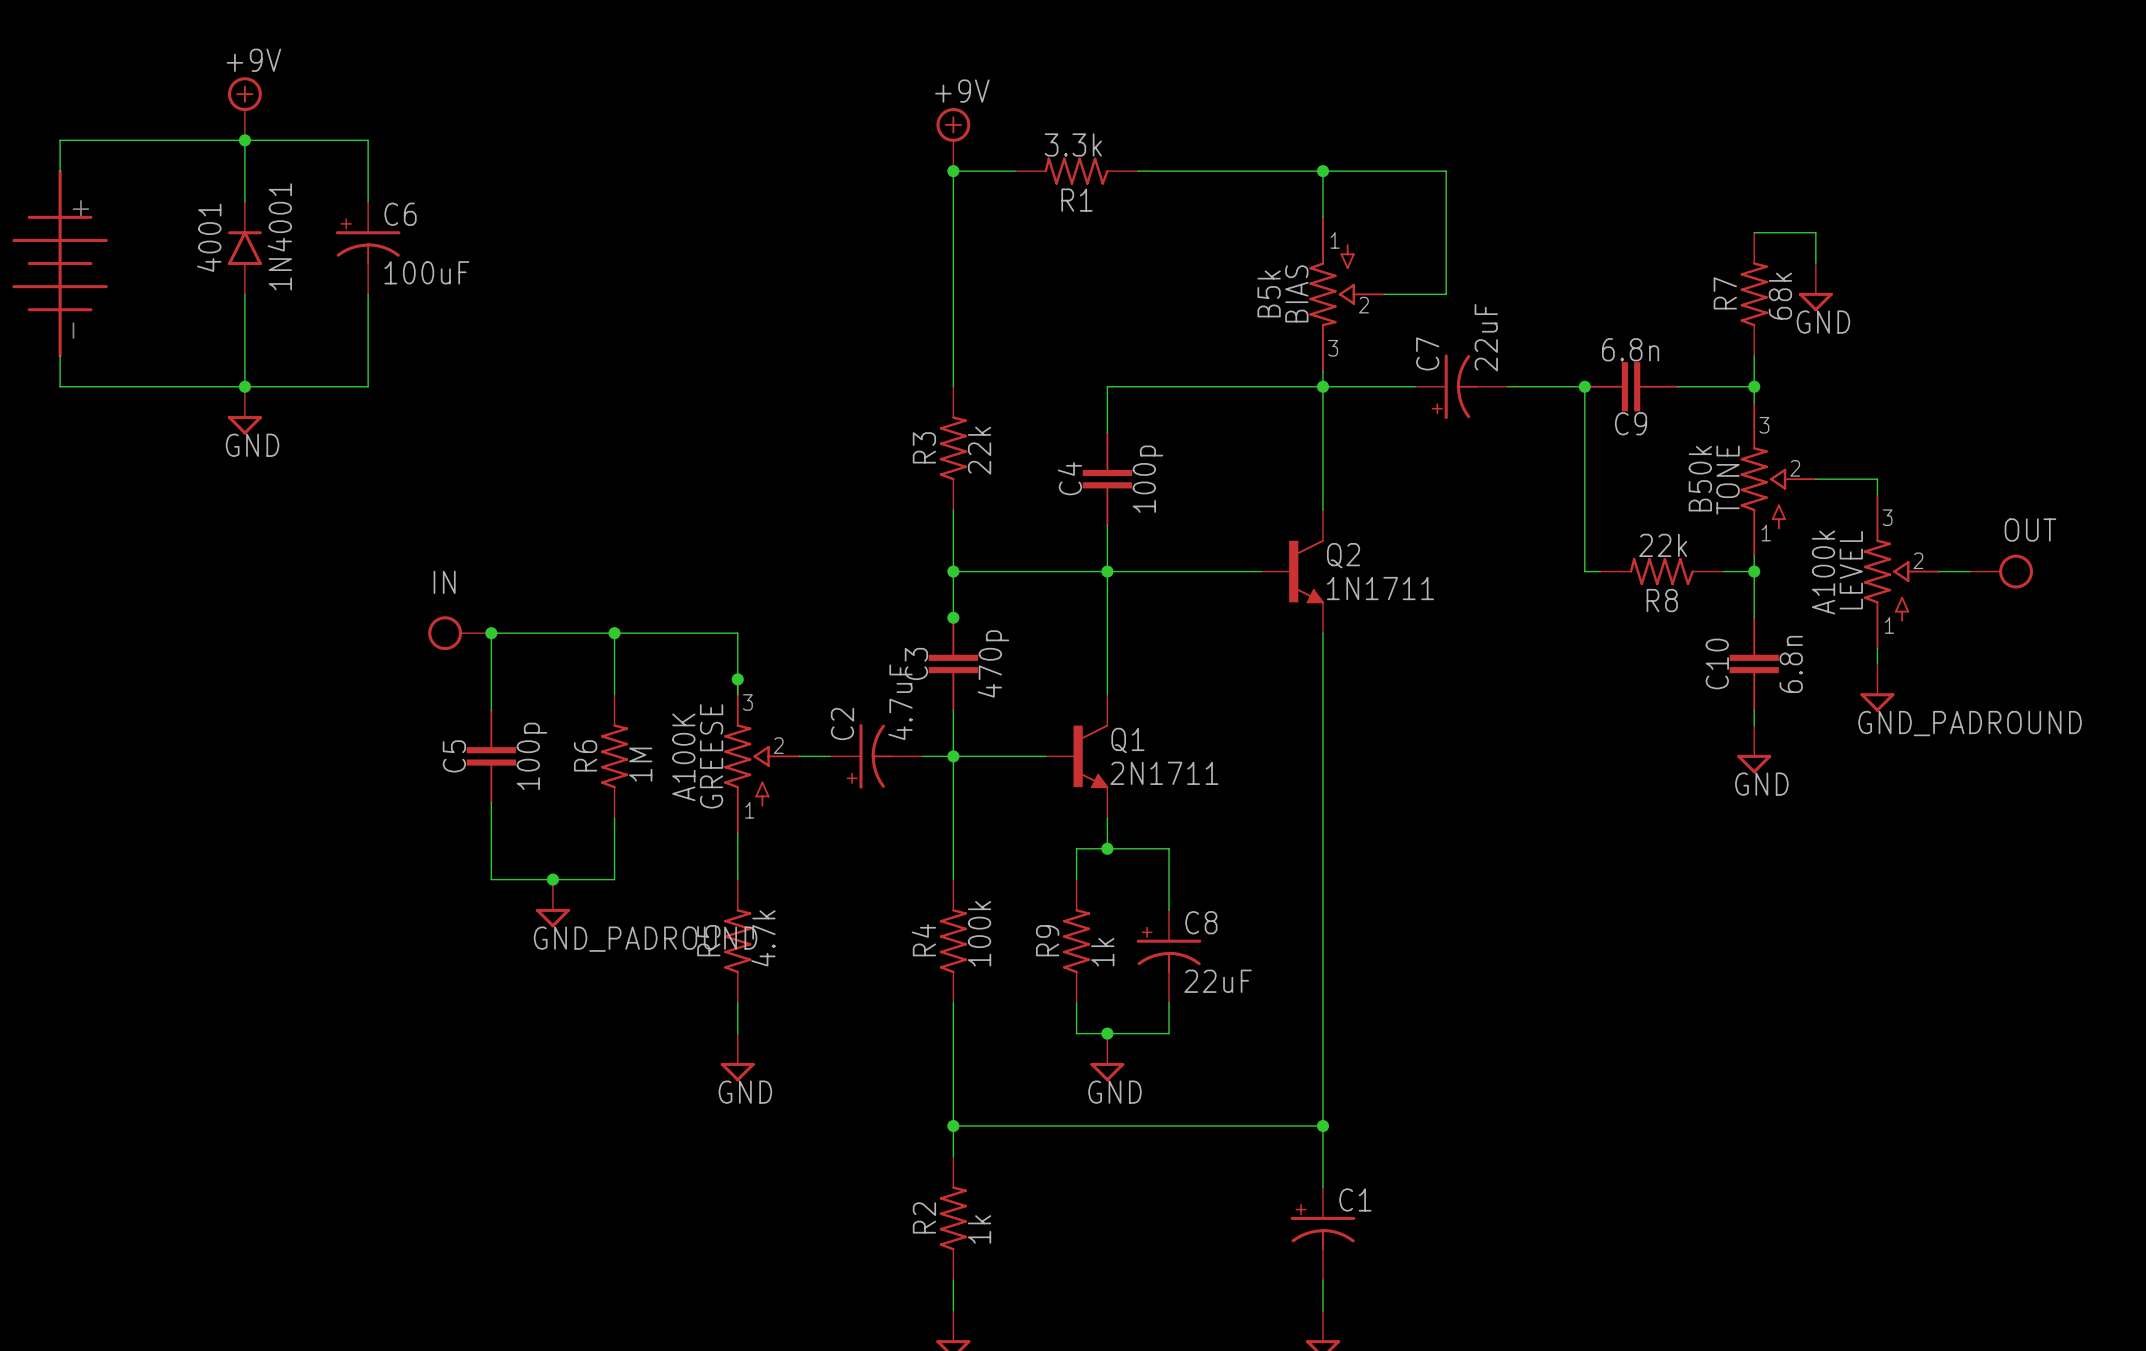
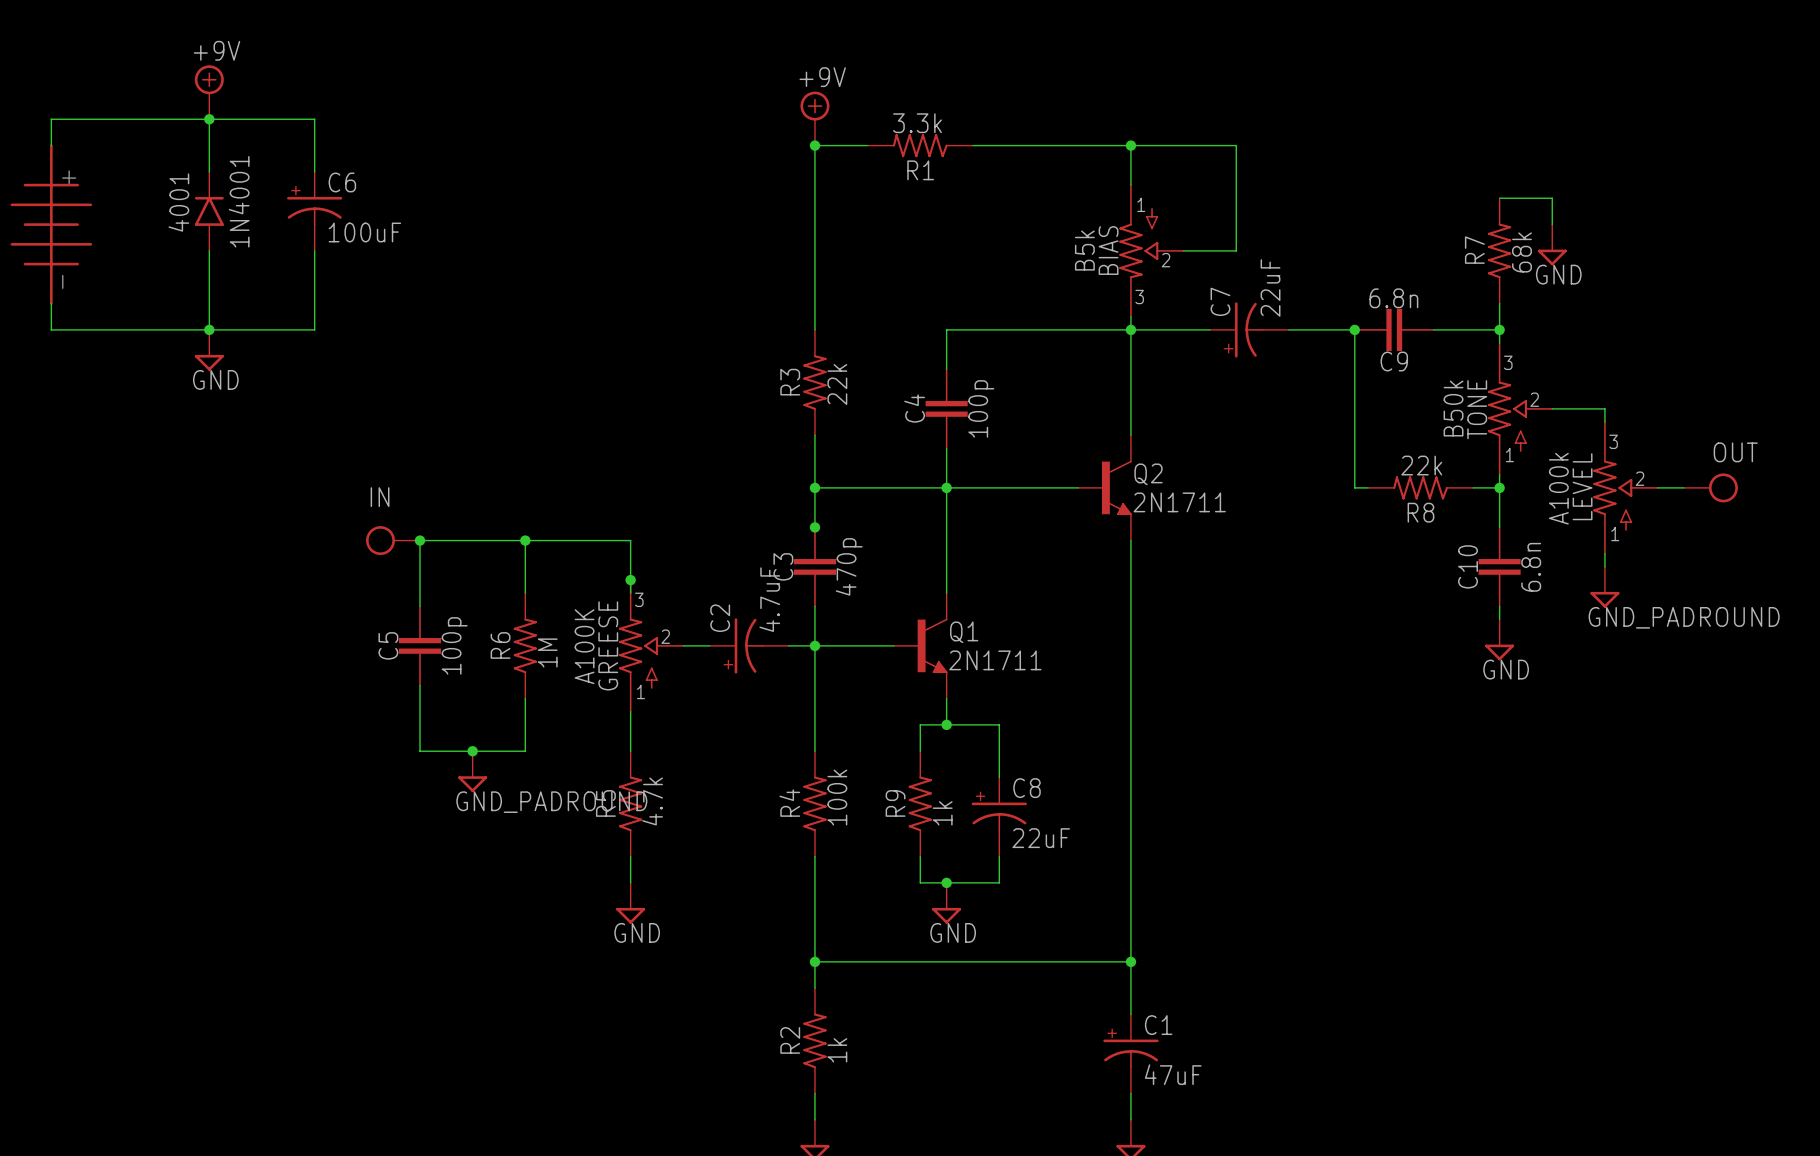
Q2 value: 1N1711 (1380, 588) -> 2N1711 (1179, 502)
C1 value: none -> 47uF (1173, 1074)

